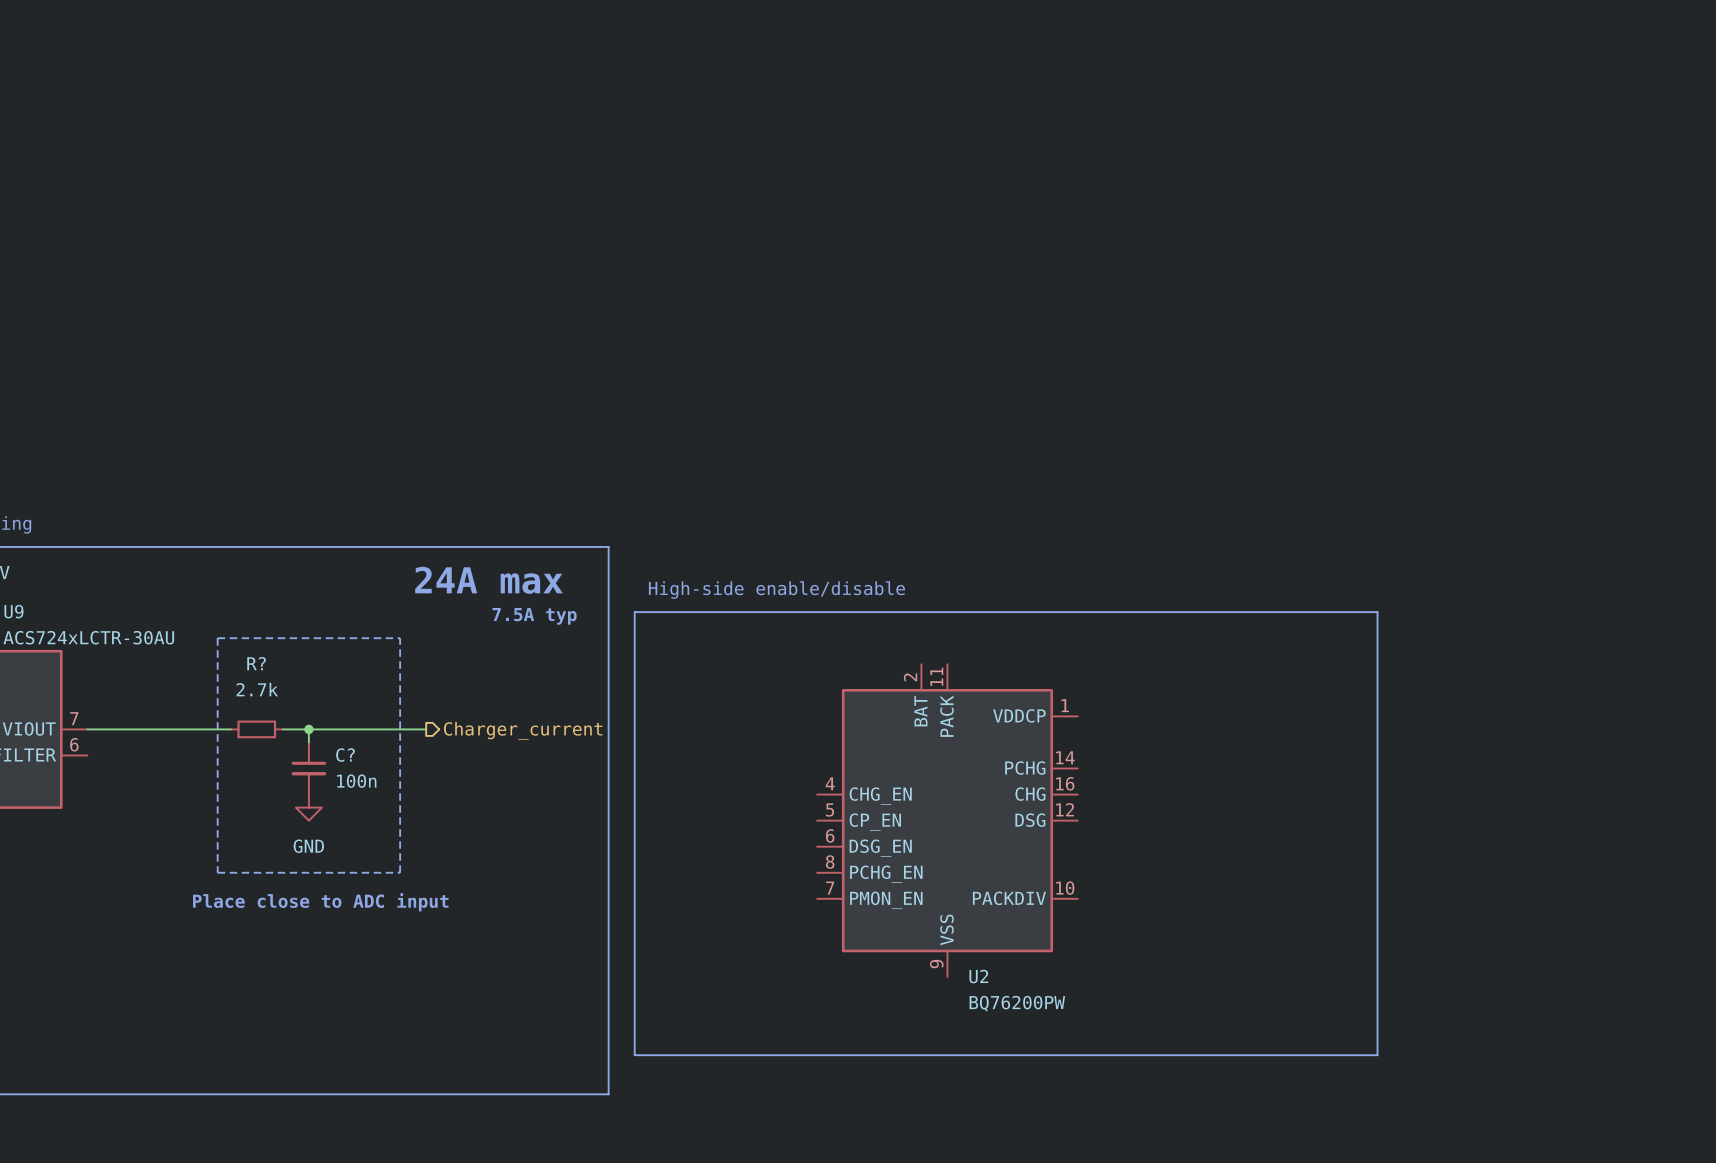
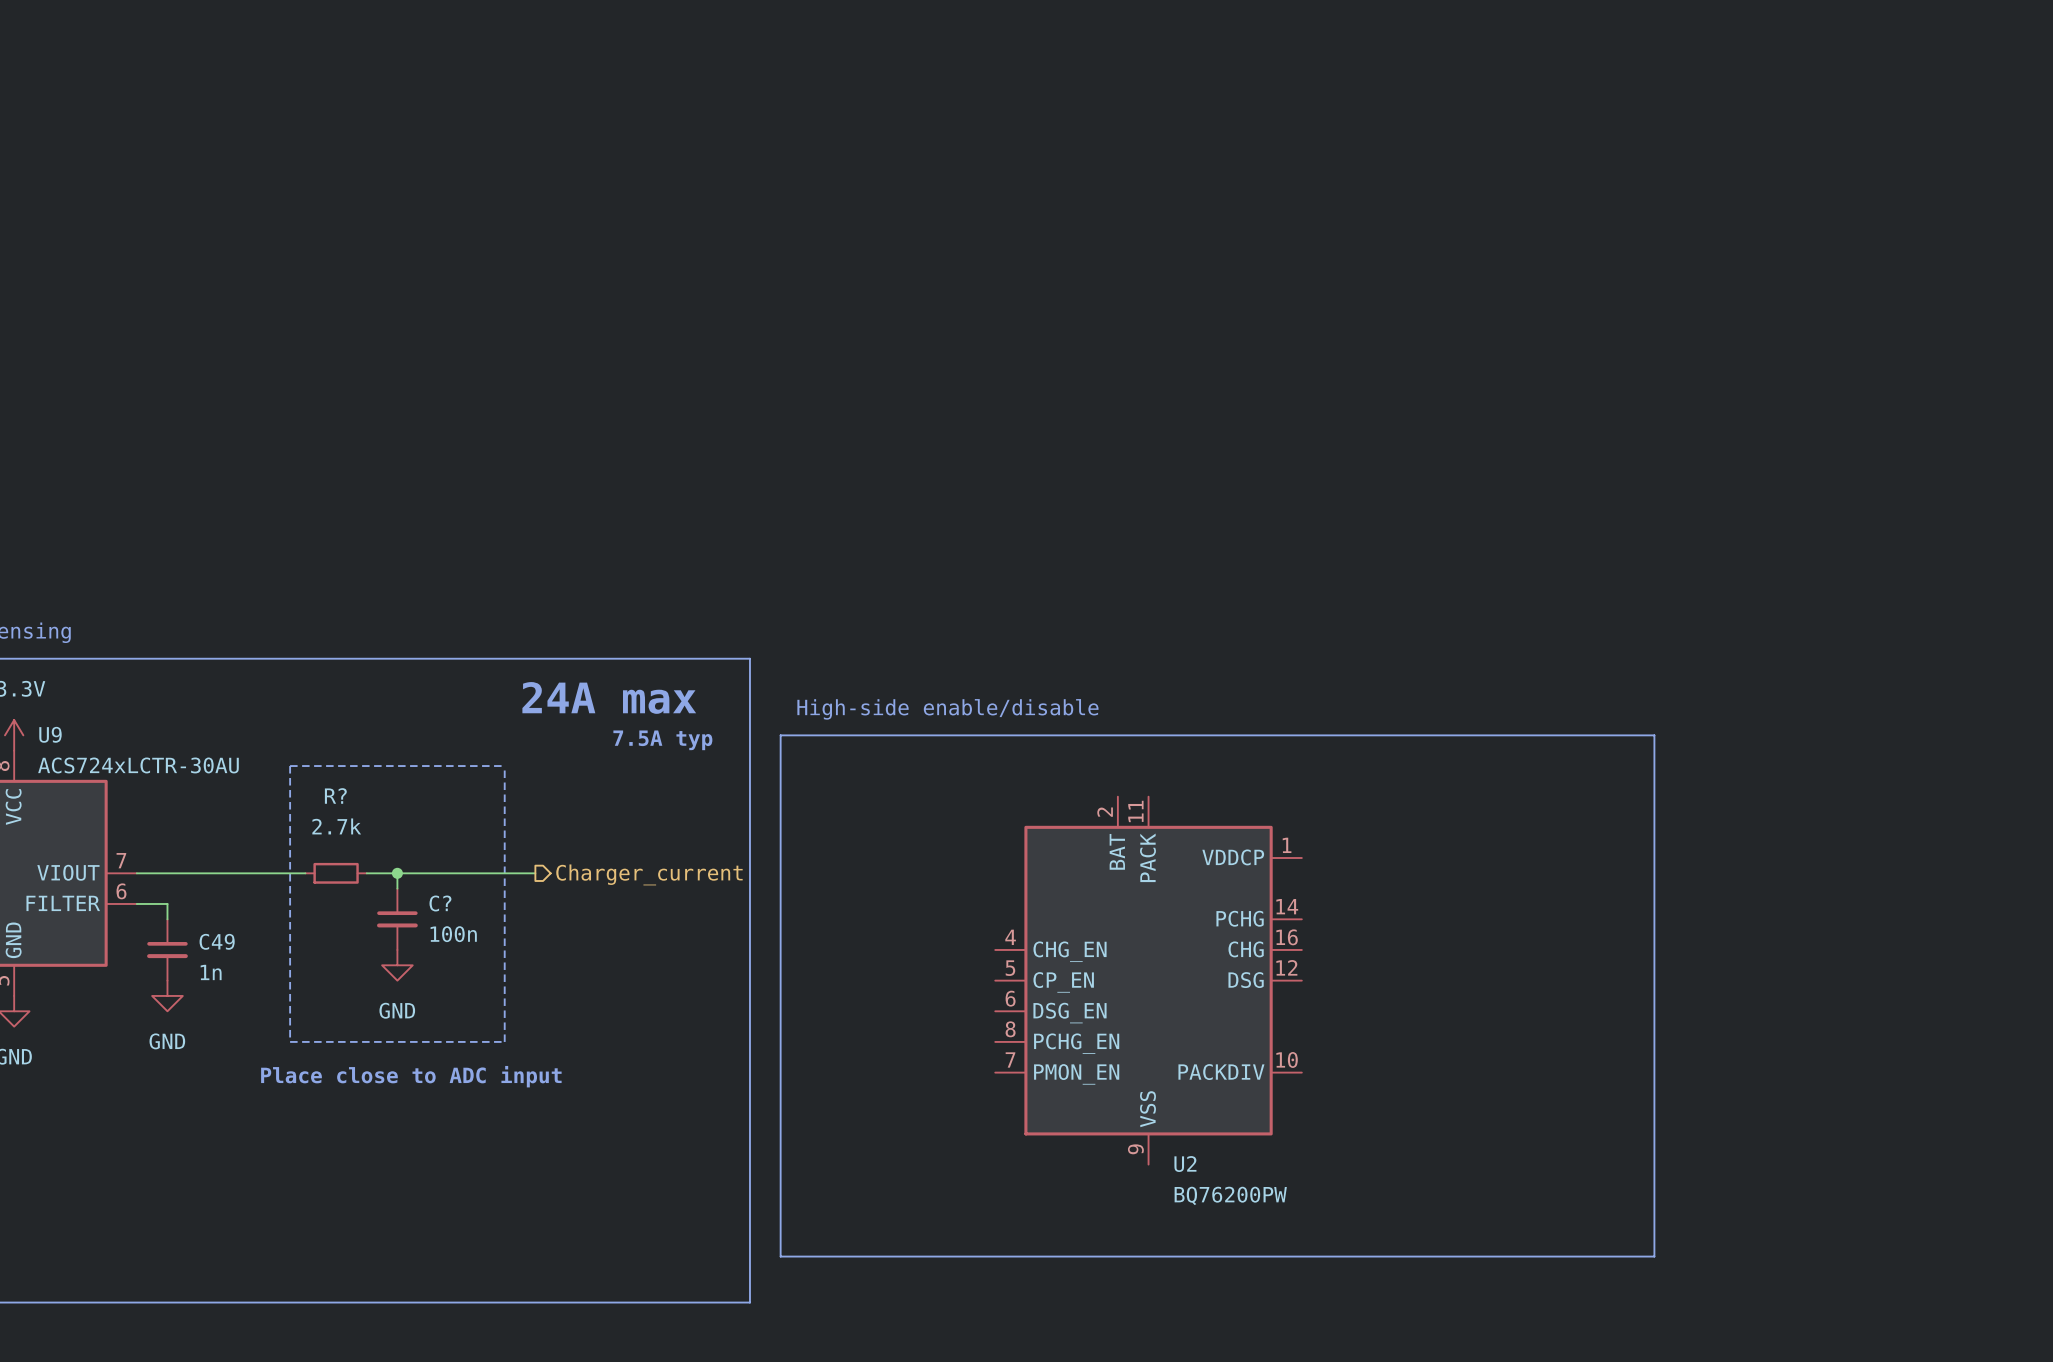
wire: none -> (136, 903) (167, 903) (167, 919)
C49: none -> 1n (167, 949)
power symbol: none -> GND (167, 995)

